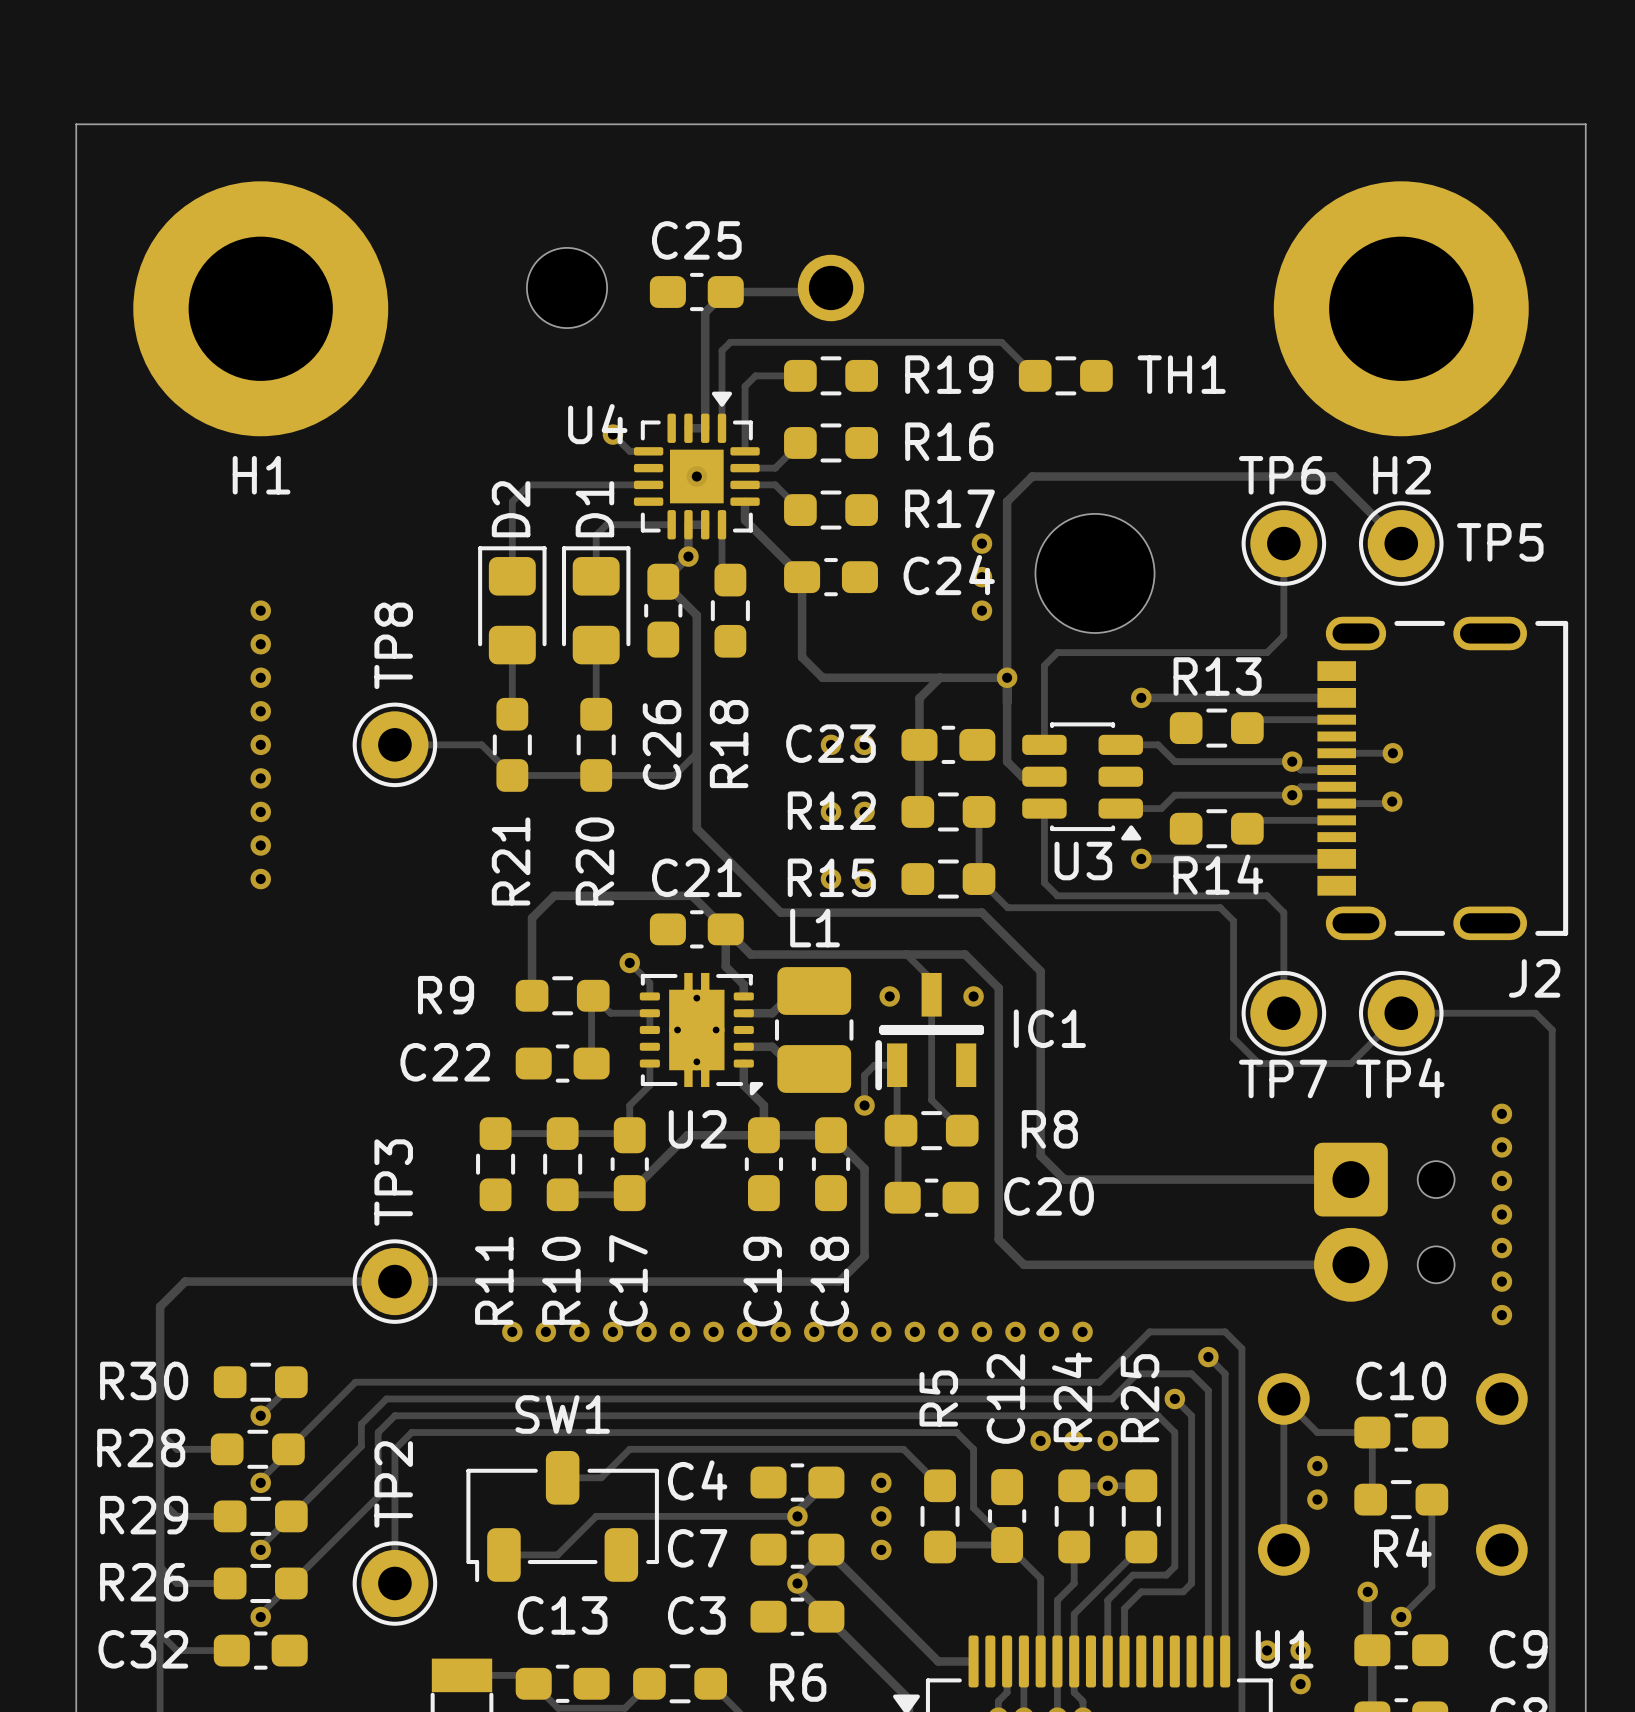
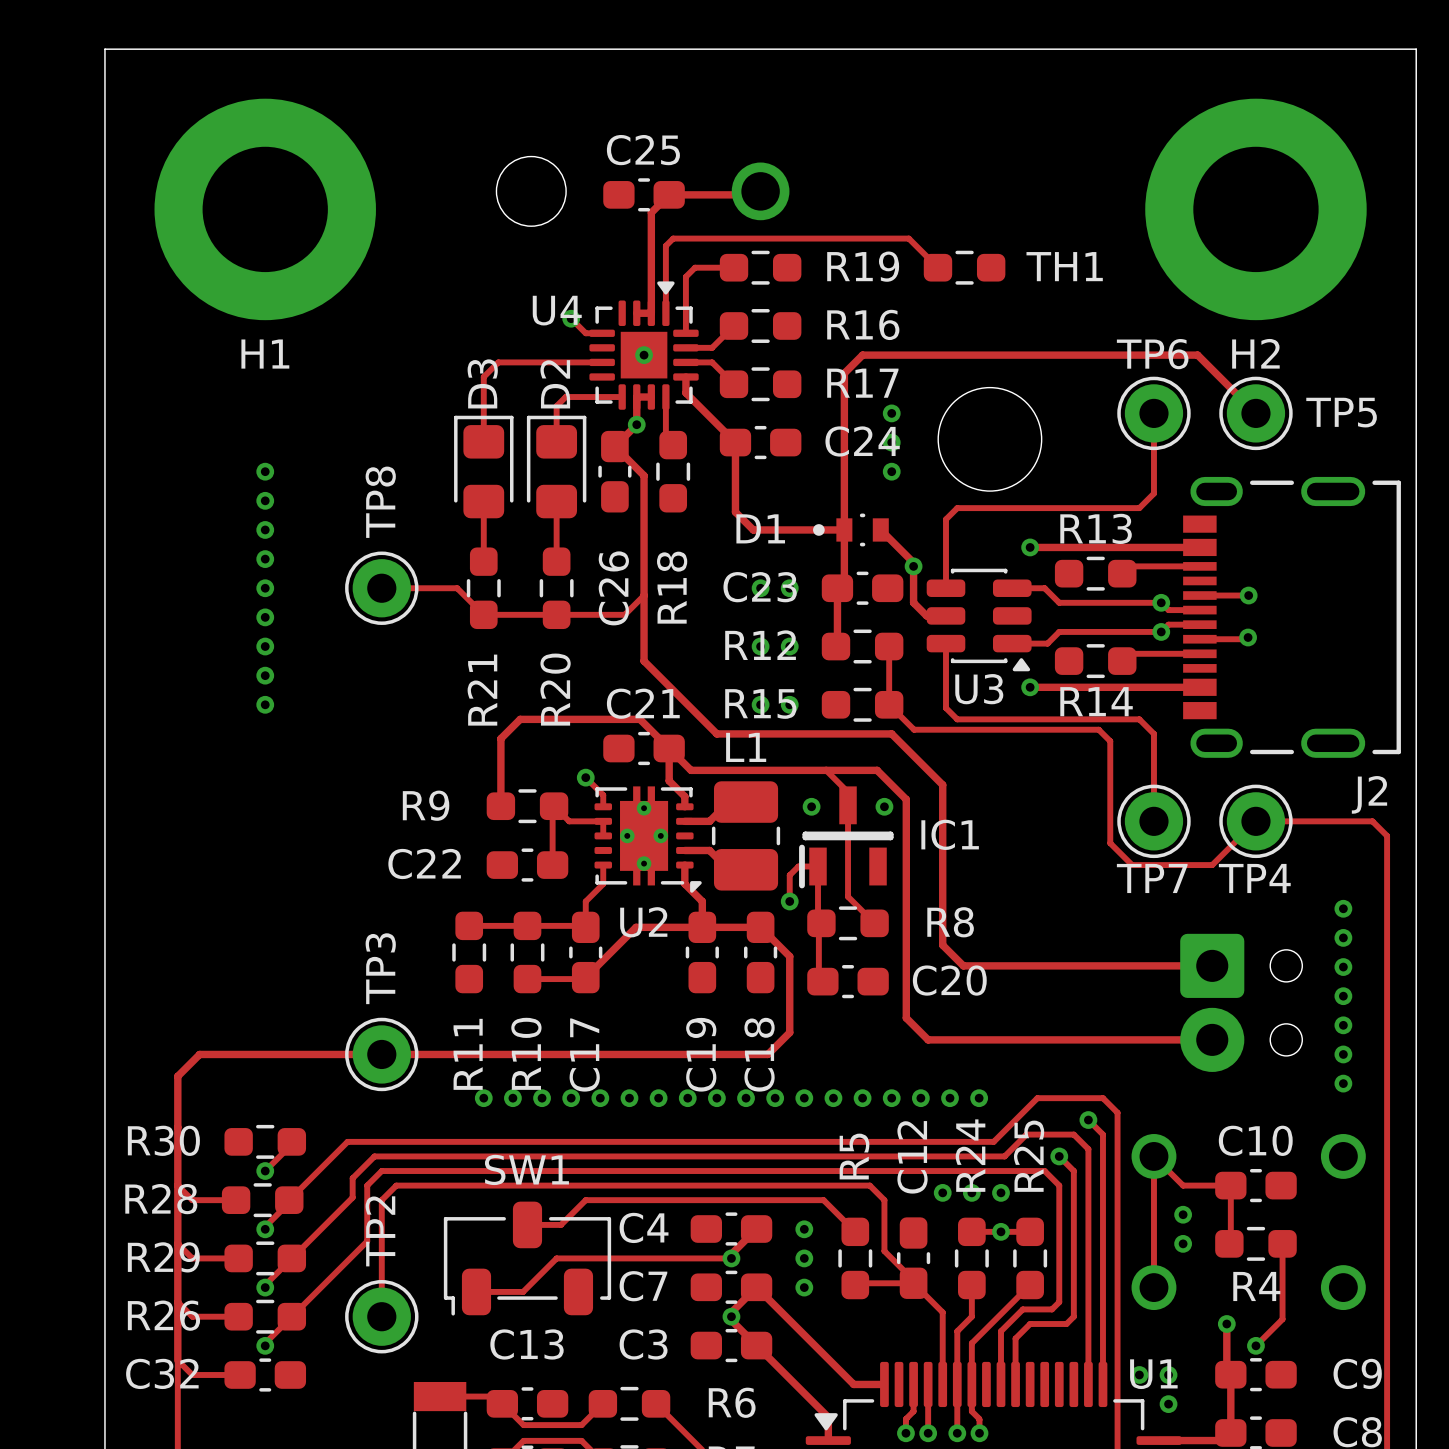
track: (1032, 476) (1007, 501) (1007, 715) -> (935, 355) (862, 355) (844, 373) (844, 581)
D2 name: D2 (511, 509) -> D3 (482, 383)
D1 name: D1 (594, 509) -> D2 (555, 384)
track: (927, 677) (1007, 677) -> none
D1: none -> (850, 529)
track: (940, 677) (919, 698) (919, 744) -> none
track: none -> (880, 529) (913, 562)
via position: (1007, 677) -> (913, 566)

